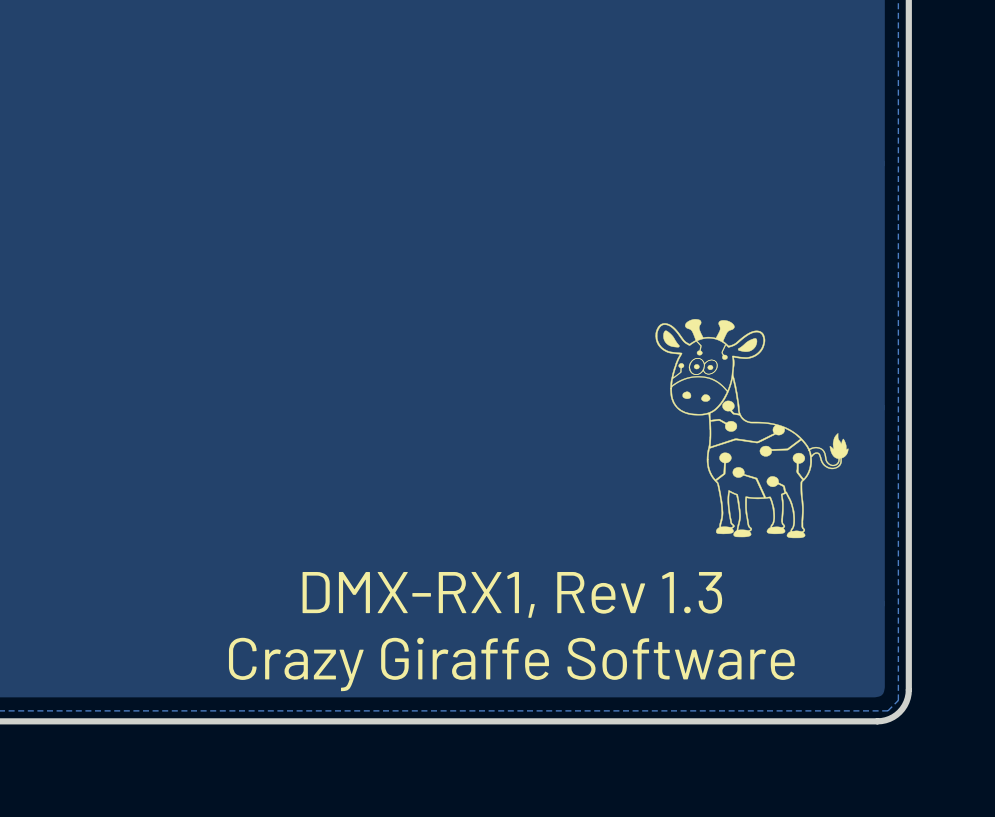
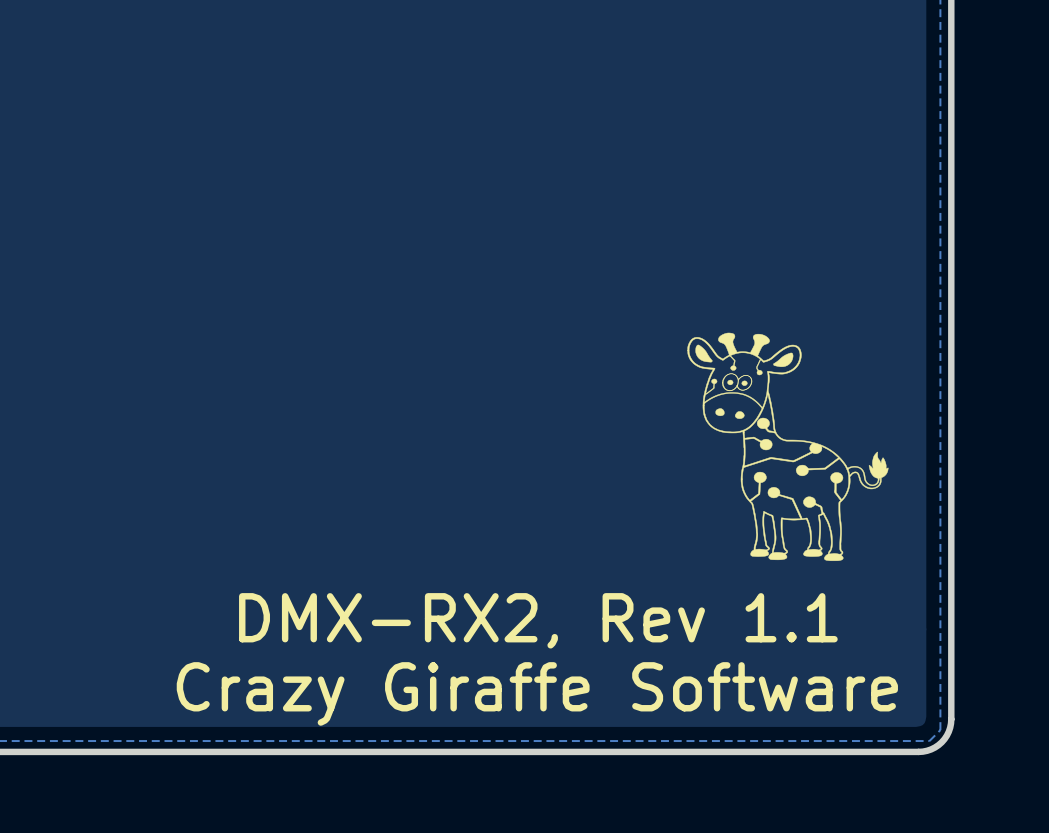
text: DMX-RX1, Rev 1.3 (512, 594) -> DMX-RX2, Rev 1.1 (538, 620)

